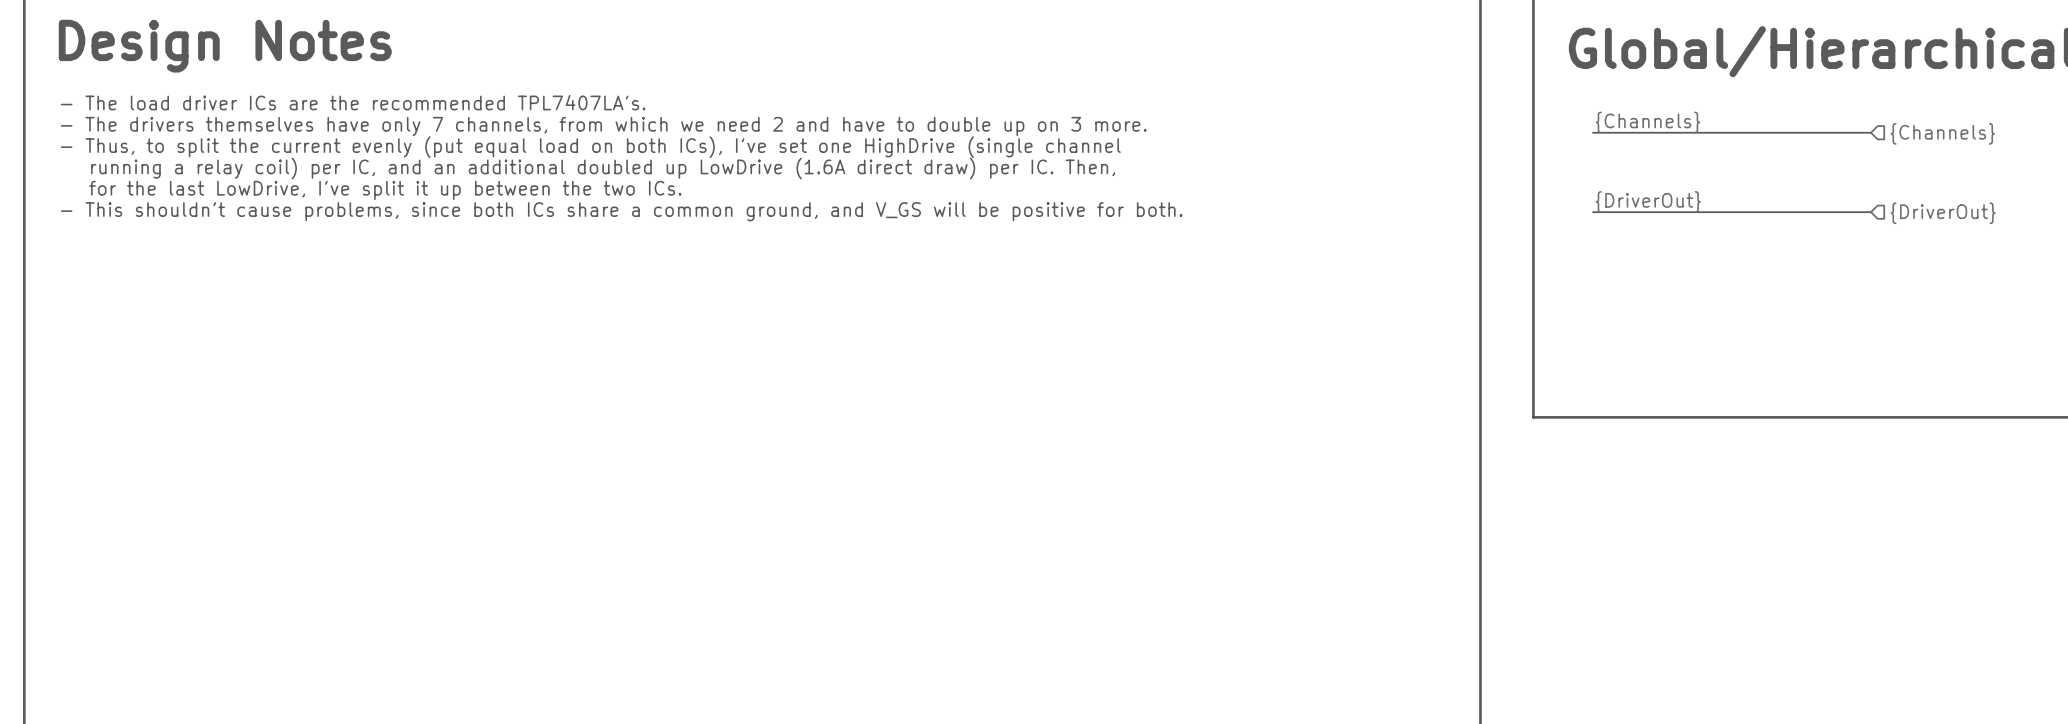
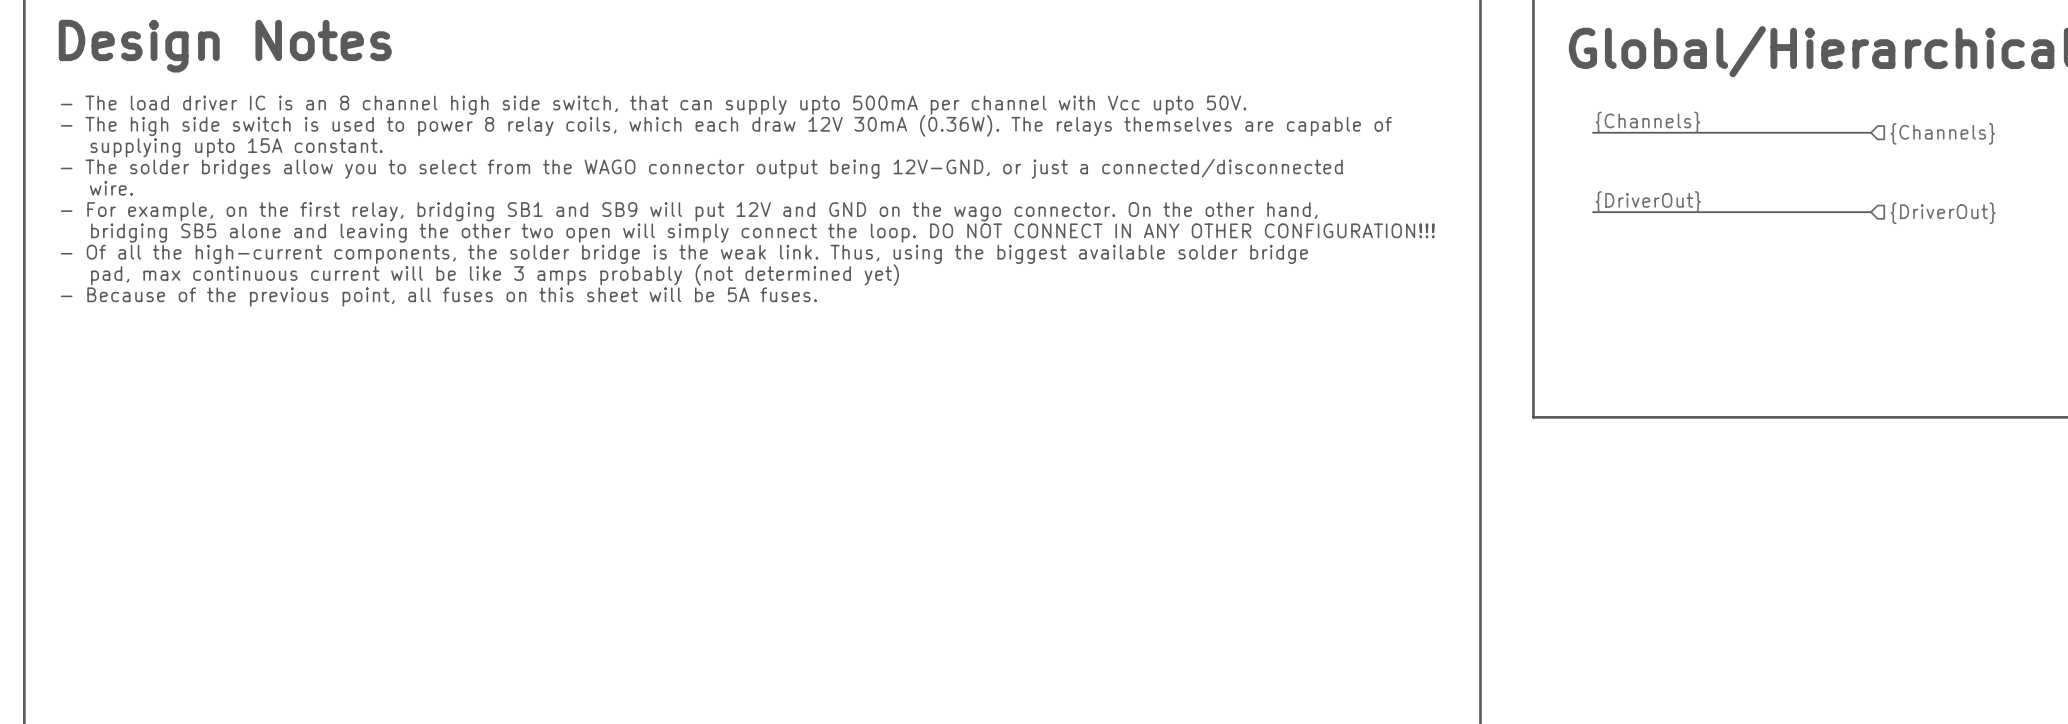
text: - The load driver ICs are the recommended TPL7407LA's. (353, 102) -> - The load driver IC is an 8 channel high side switch, that can supply upto 500mA per channel with Vcc upto 50V. (653, 105)
text: - The drivers themselves have only 7 channels, from which we need 2 and have to double up on 3 more. (603, 126) -> - The high side switch is used to power 8 relay coils, which each draw 12V 30mA (0.36W). The relays themselves are capable of (726, 125)
text: - Thus, to split the current evenly (put equal load on both ICs), I've set one HighDrive (single channel (590, 147) -> supplying upto 15A constant. (236, 147)
text: running a relay coil) per IC, and an additional doubled up LowDrive (1.6A direct draw) per IC. Then, (603, 168) -> - The solder bridges allow you to select from the WAGO connector output being 12V-GND, or just a connected/disconnected (701, 168)
text: for the last LowDrive, I've split it up between the two ICs. (385, 190) -> wire. (111, 188)
text: - This shouldn't cause problems, since both ICs share a common ground, and V_GS will be positive for both. (621, 211) -> - For example, on the first relay, bridging SB1 and SB9 will put 12V and GND on the wago connector. On the other hand, (689, 211)
text: none -> bridging SB5 alone and leaving the other two open will simply connect the loop. DO NOT CONNECT IN ANY OTHER CONFIGURATION!!! (762, 233)
text: none -> - Of all the high-current components, the solder bridge is the weak link. Thus, using the biggest available solder bridge (684, 254)
text: none -> pad, max continuous current will be like 3 amps probably (not determined yet) (495, 275)
text: none -> - Because of the previous point, all fuses on this sheet will be 5A fuses. (438, 296)

